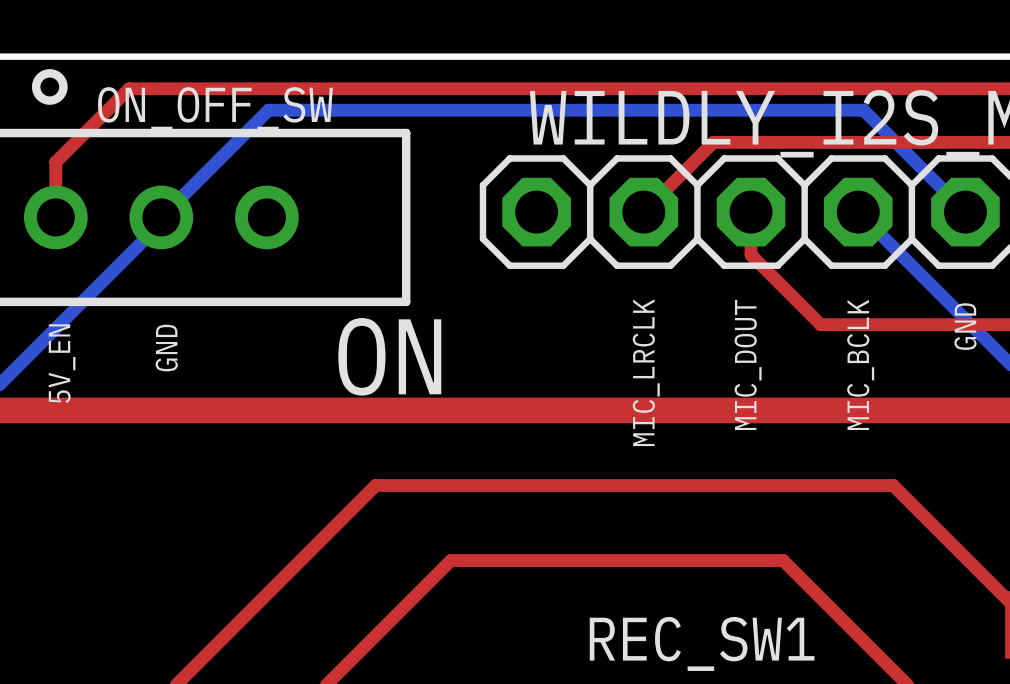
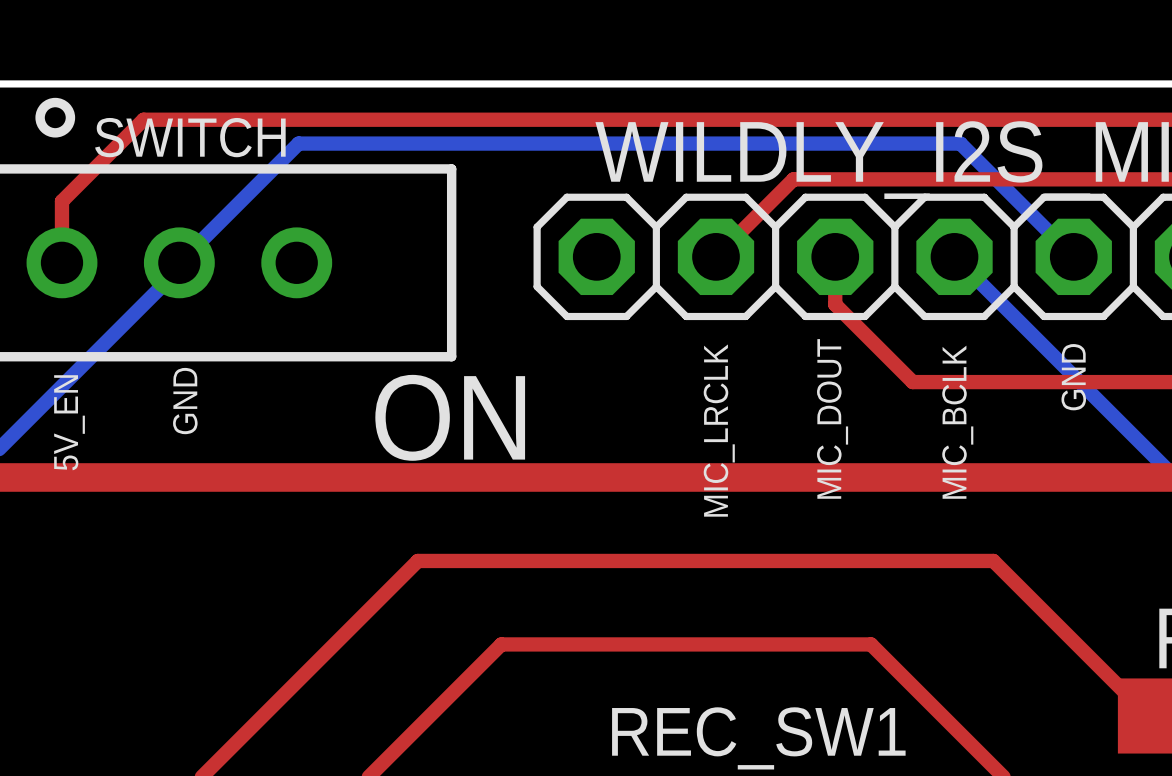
ON_OFF_SW name: ON_OFF_SW (215, 108) -> SWITCH (190, 137)

